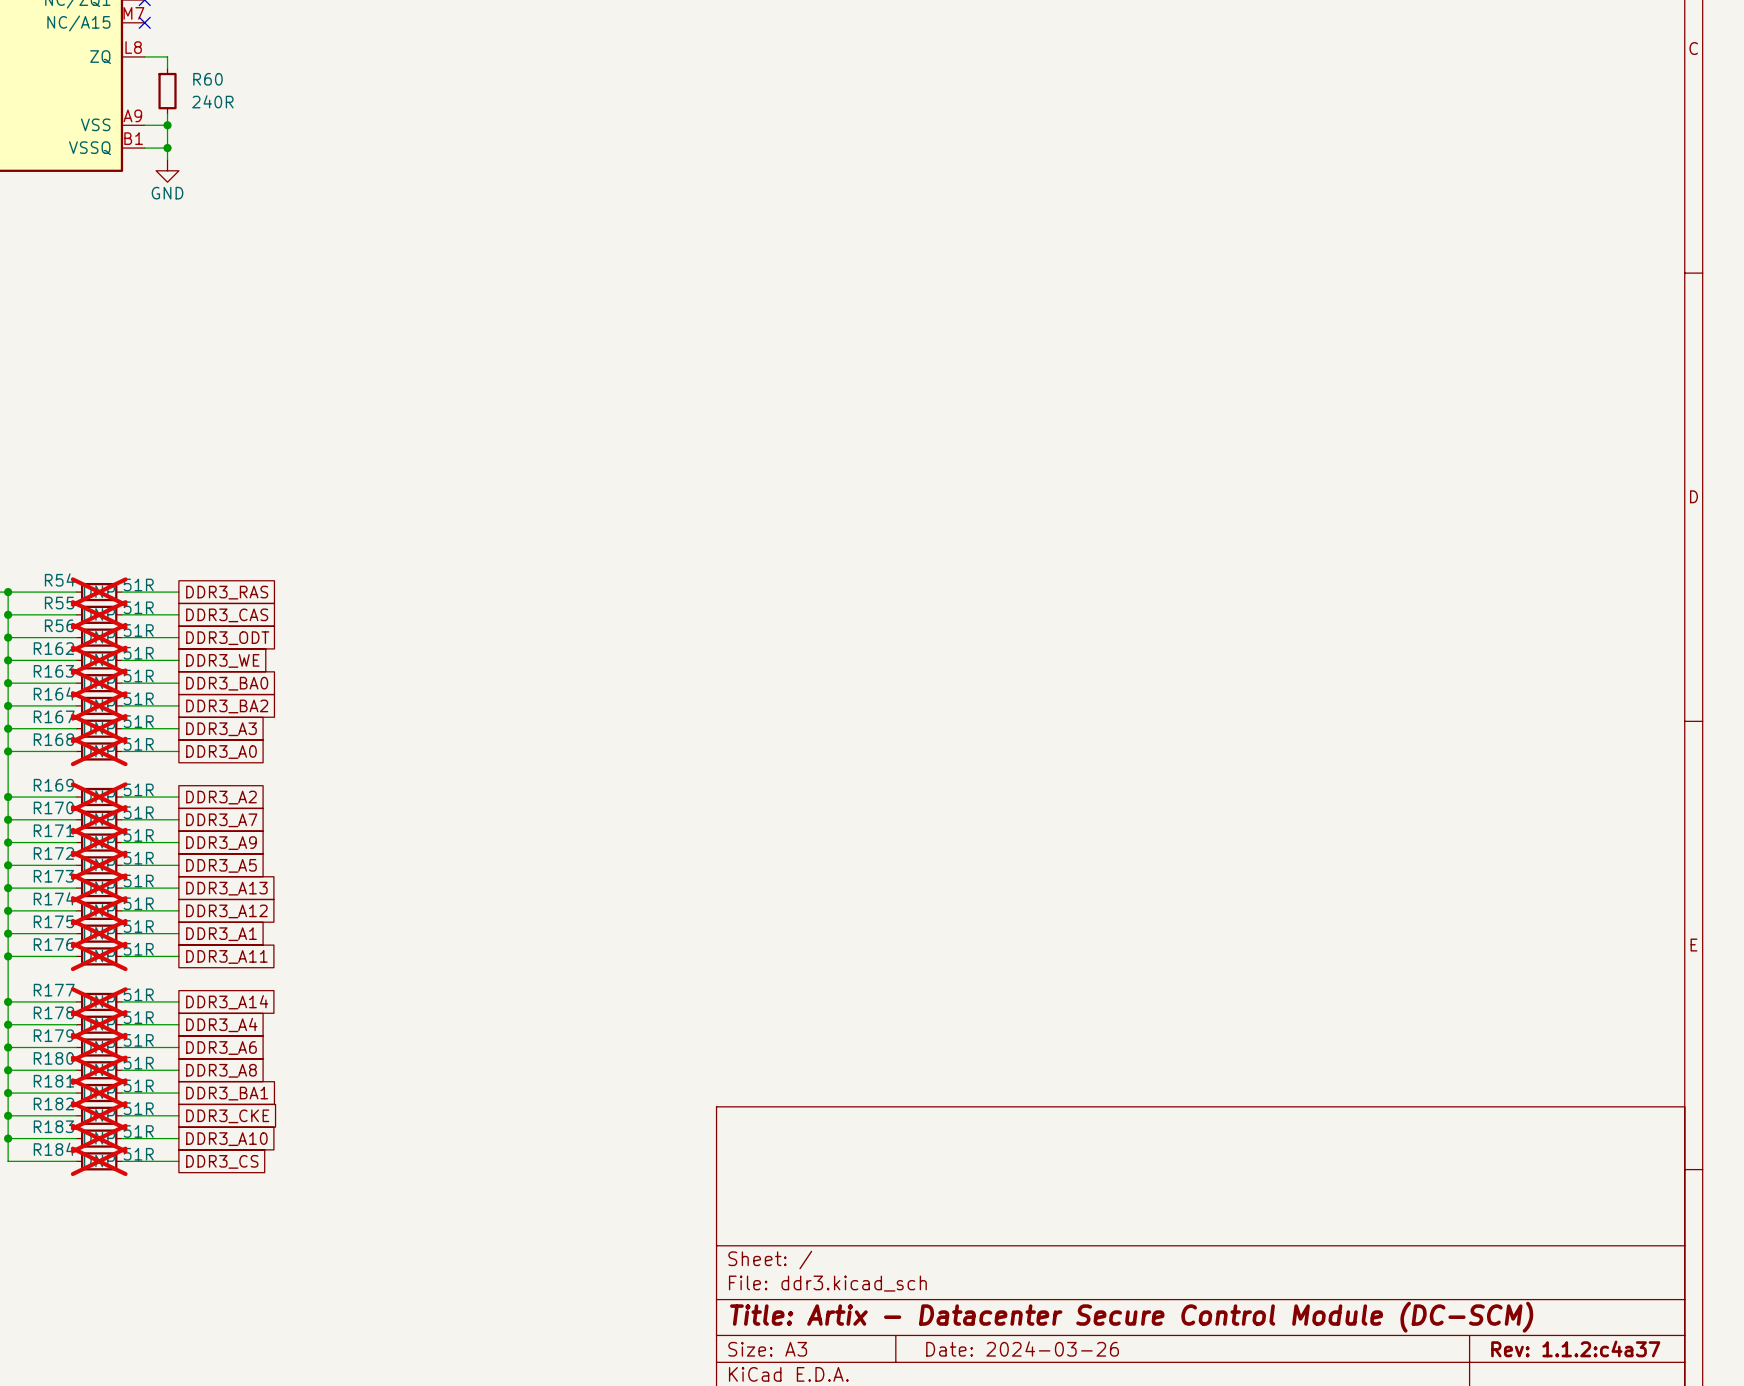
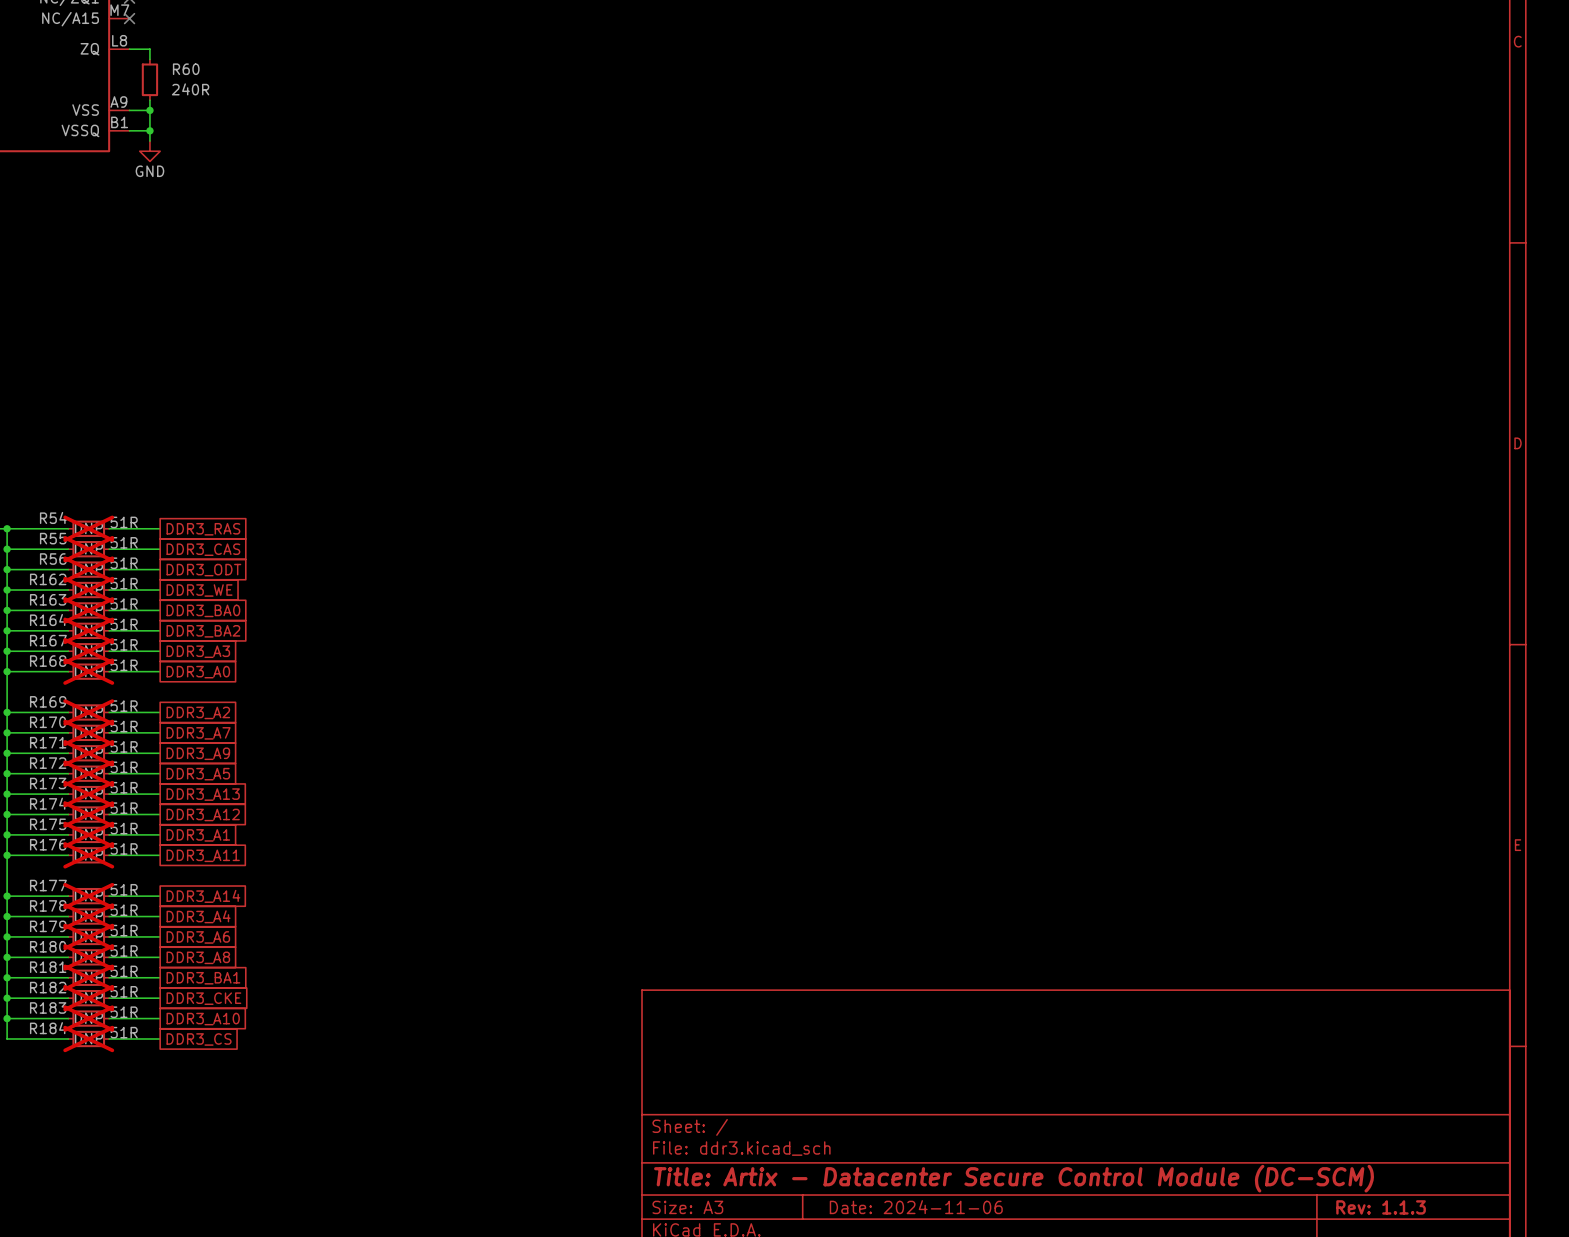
title block: Date: 2024-03-26 (1022, 1348) -> Date: 2024-11-06 (916, 1207)
title block: Rev: 1.1.2:c4a37 (1575, 1348) -> Rev: 1.1.3 (1381, 1207)

